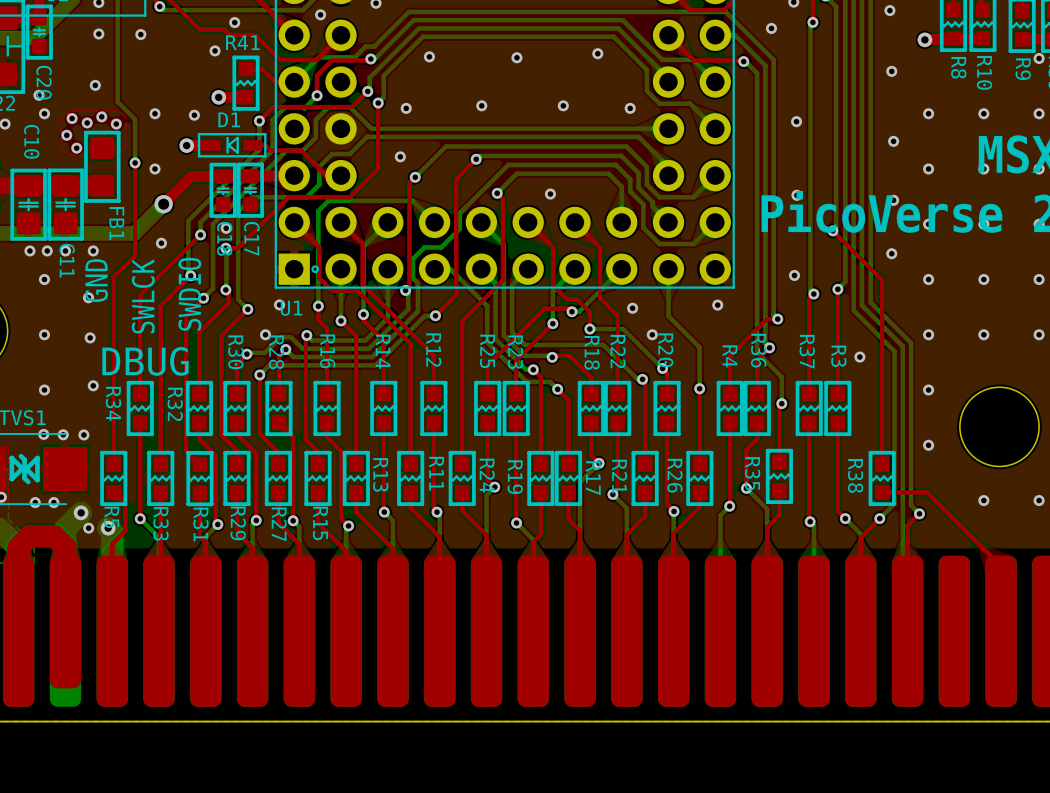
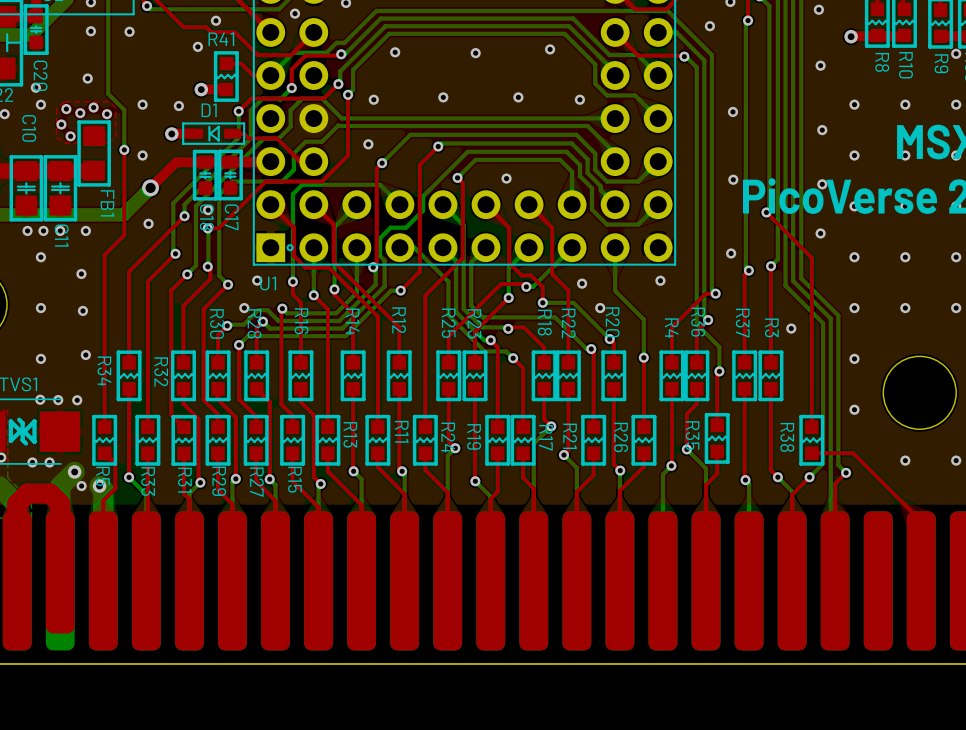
text: GND (96, 280) -> none
text: SWDIO (189, 294) -> none
text: SWLCK (143, 296) -> none
text: DBUG (145, 361) -> none

